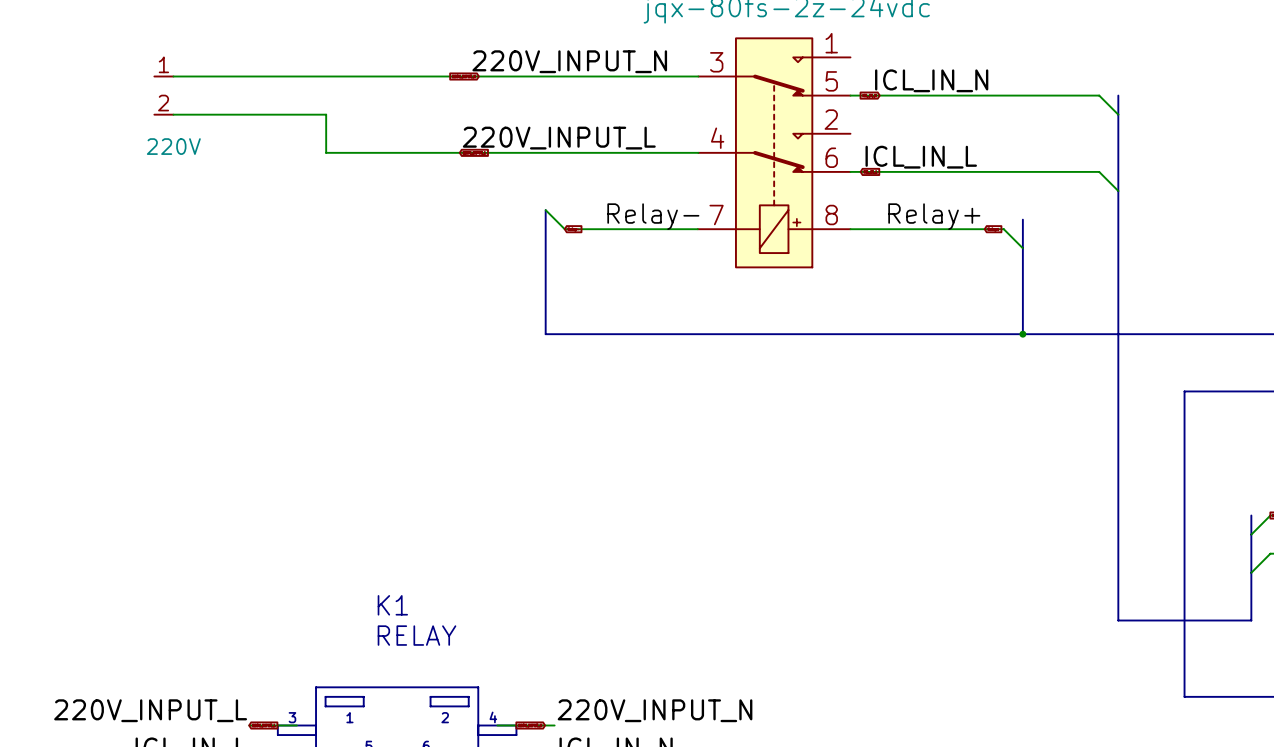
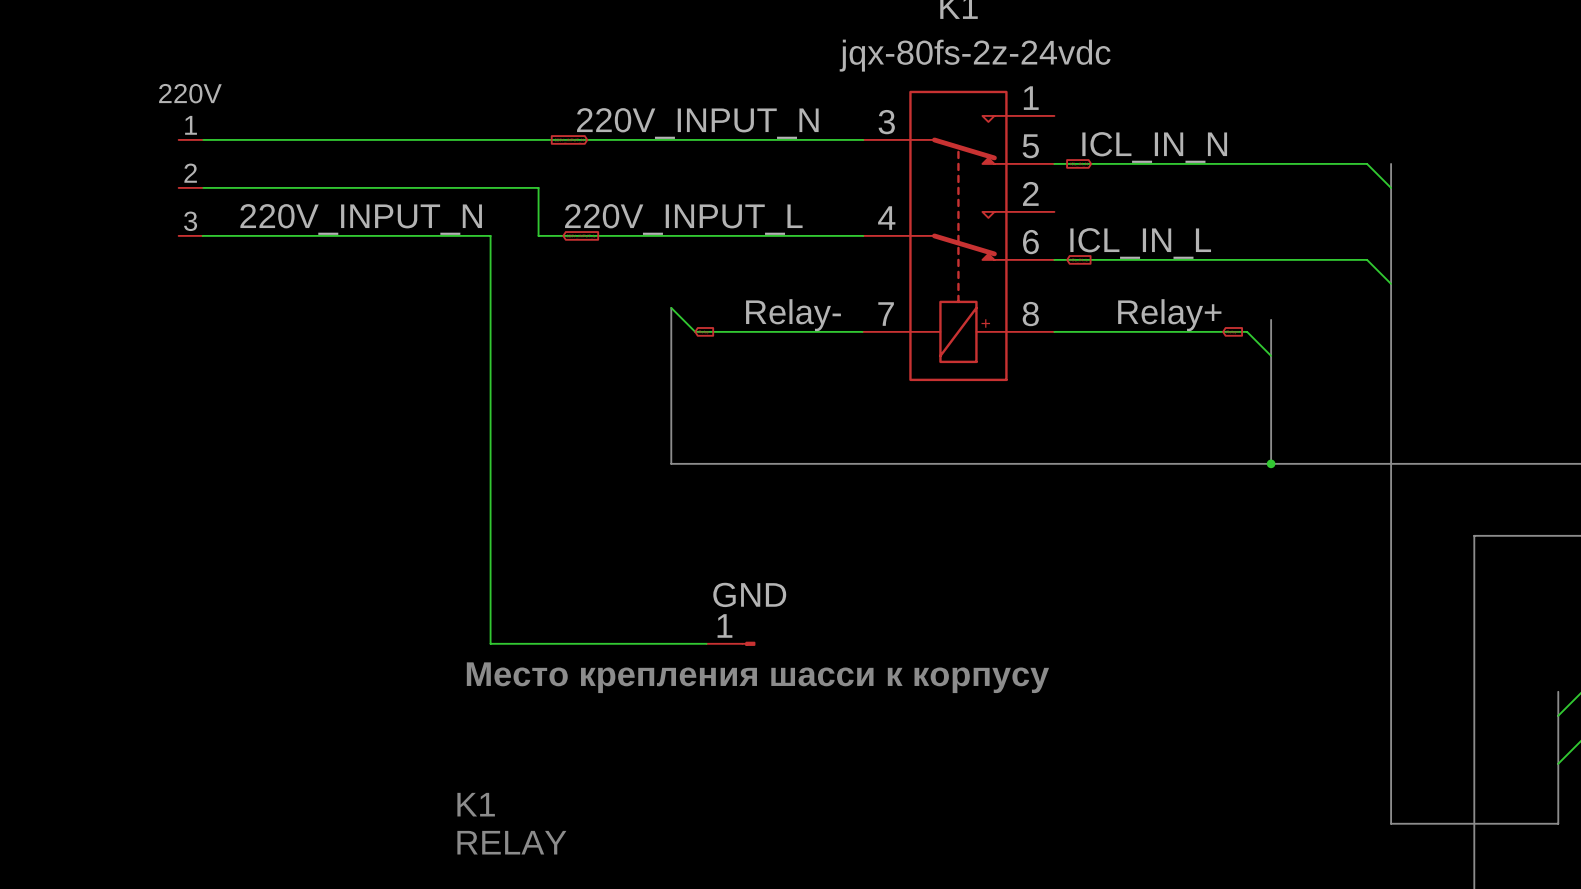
220V symbol: [154, 76, 174, 115] -> [178, 139, 203, 236]
wire: (326, 114) (326, 152) -> (202, 235) (395, 235)
label: none -> 220V_INPUT_N (361, 219)
220V name position: 220V (173, 146) -> 220V (190, 93)
wire: (401, 152) (440, 152) -> (395, 187) (538, 187) (538, 235)
wire: none -> (490, 235) (490, 643) (706, 643)
GND: none -> (730, 643)
text: none -> Место крепления шасси к корпусу (757, 677)

